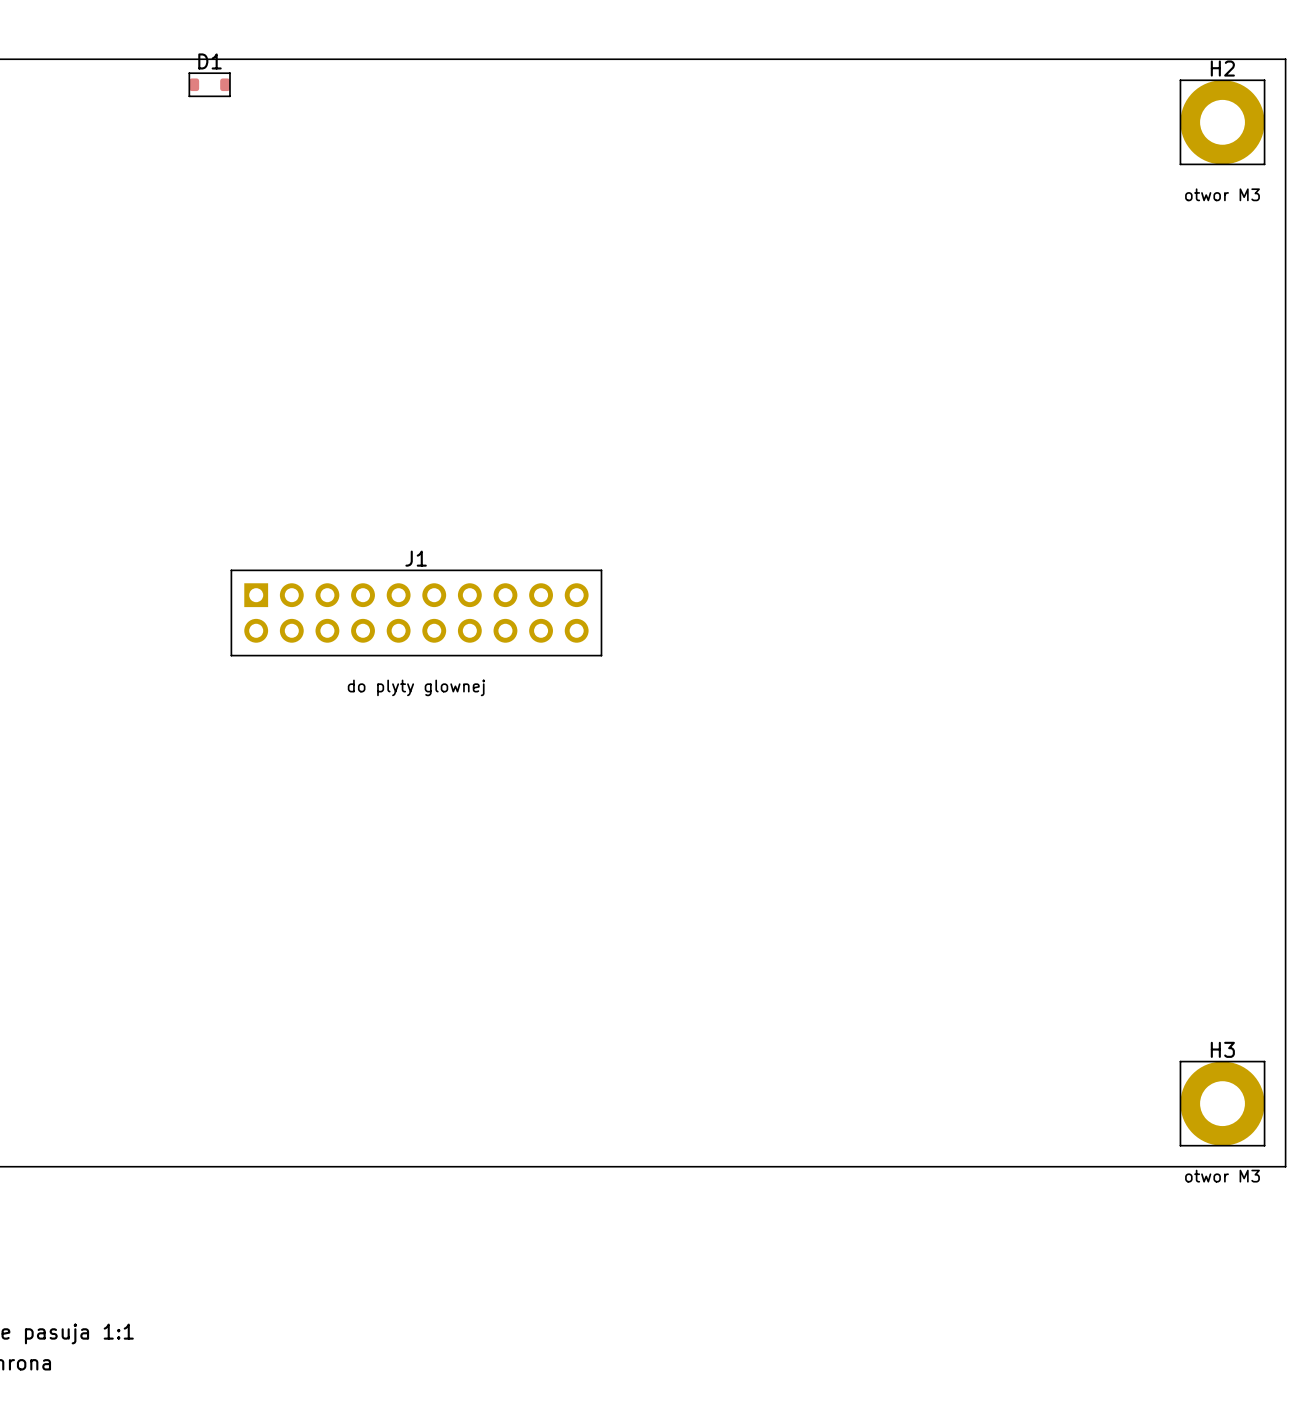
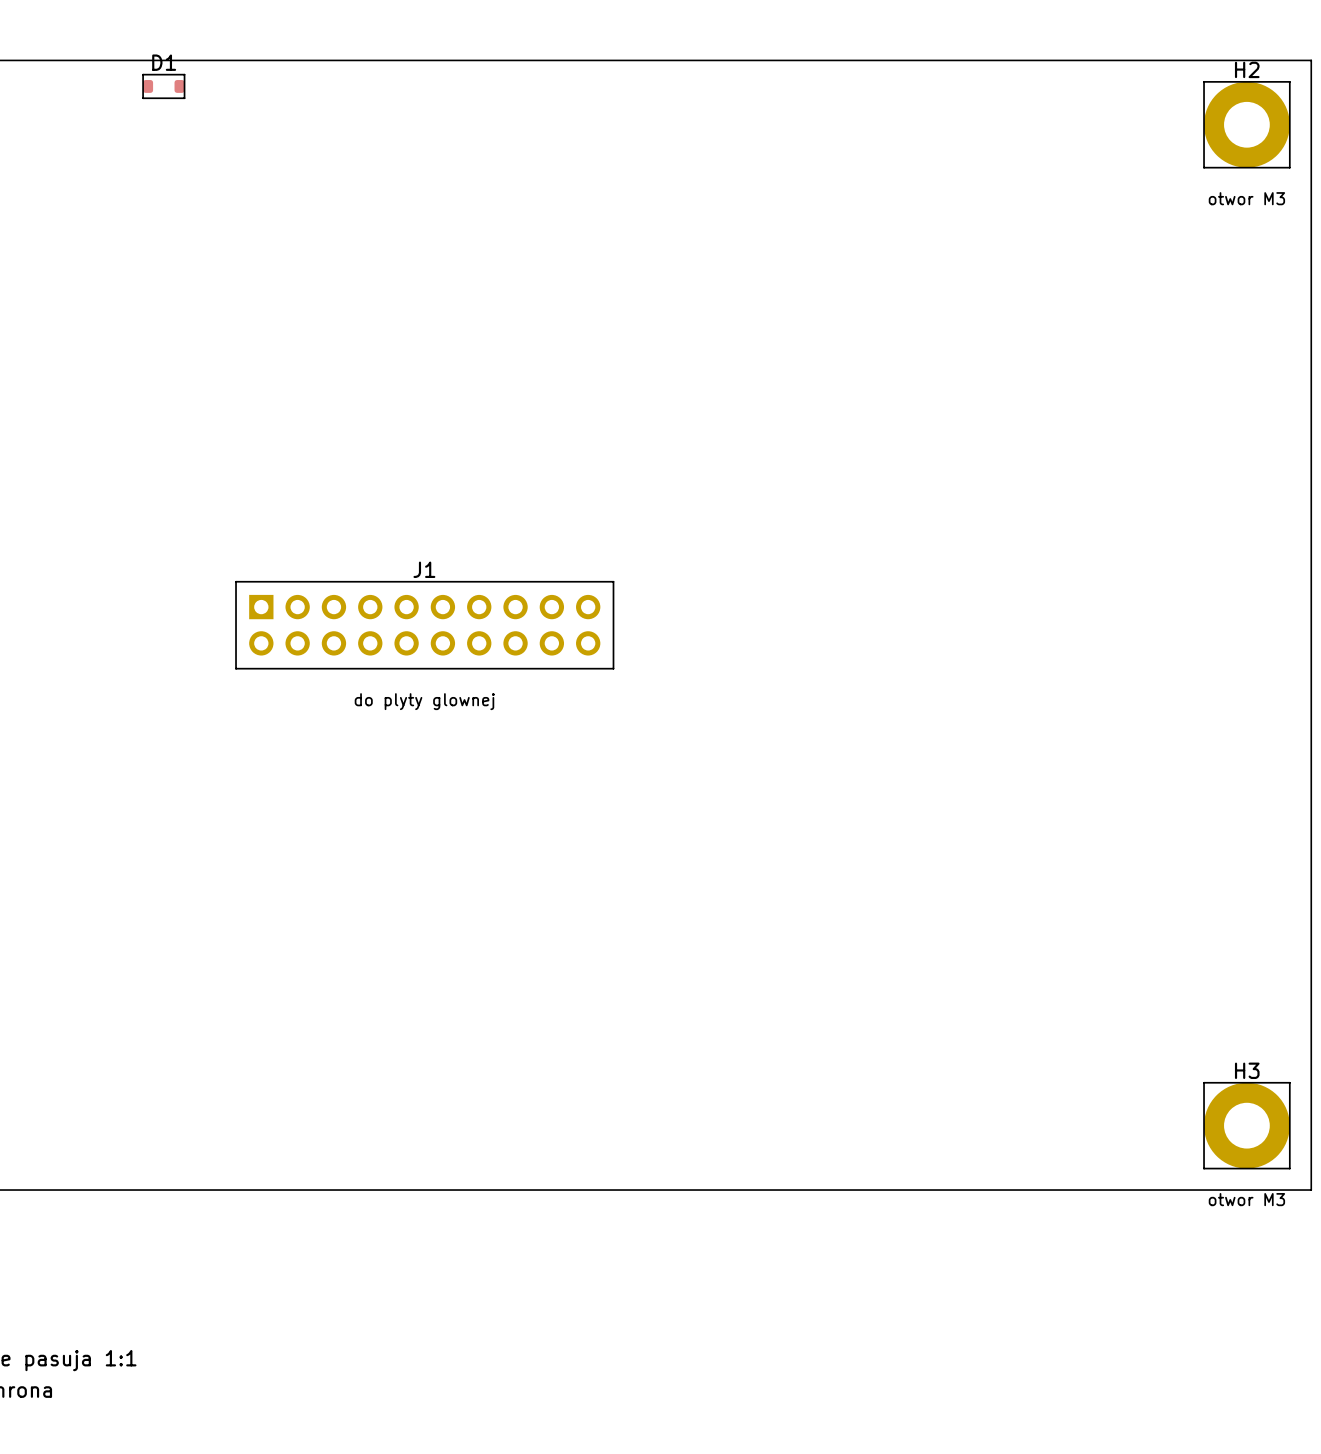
D1 position: (209, 84) -> (163, 86)

